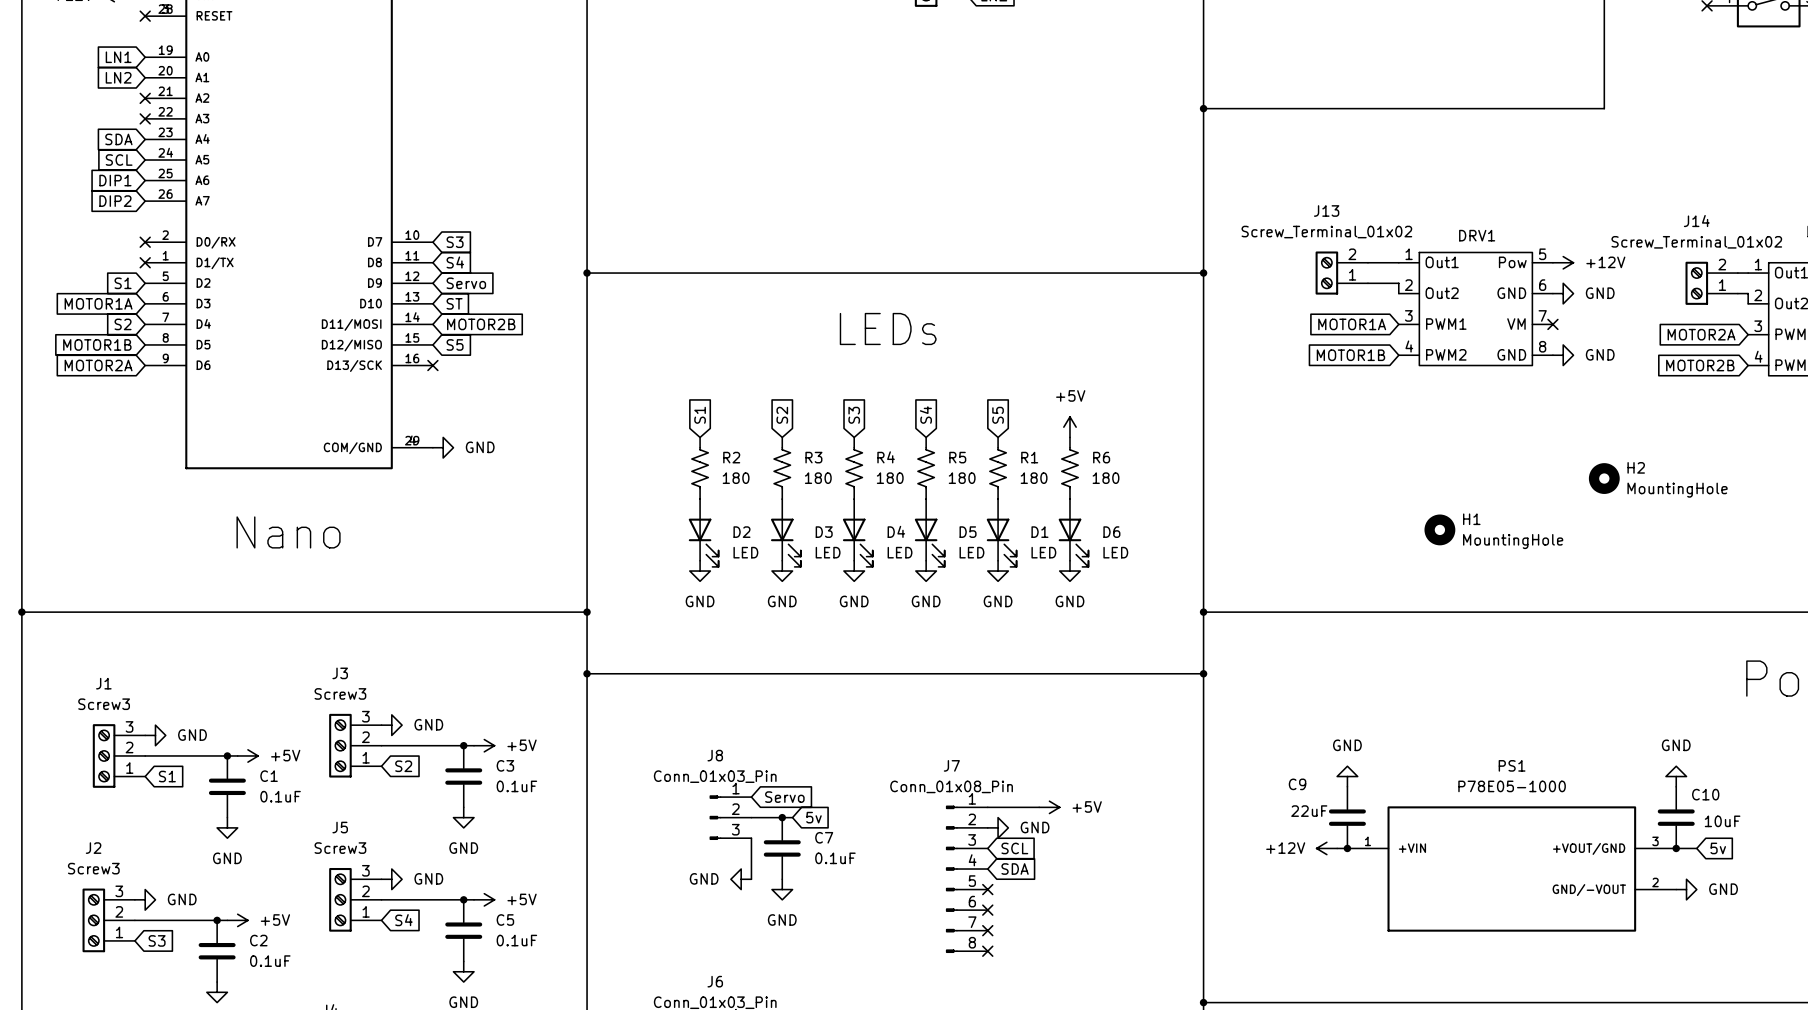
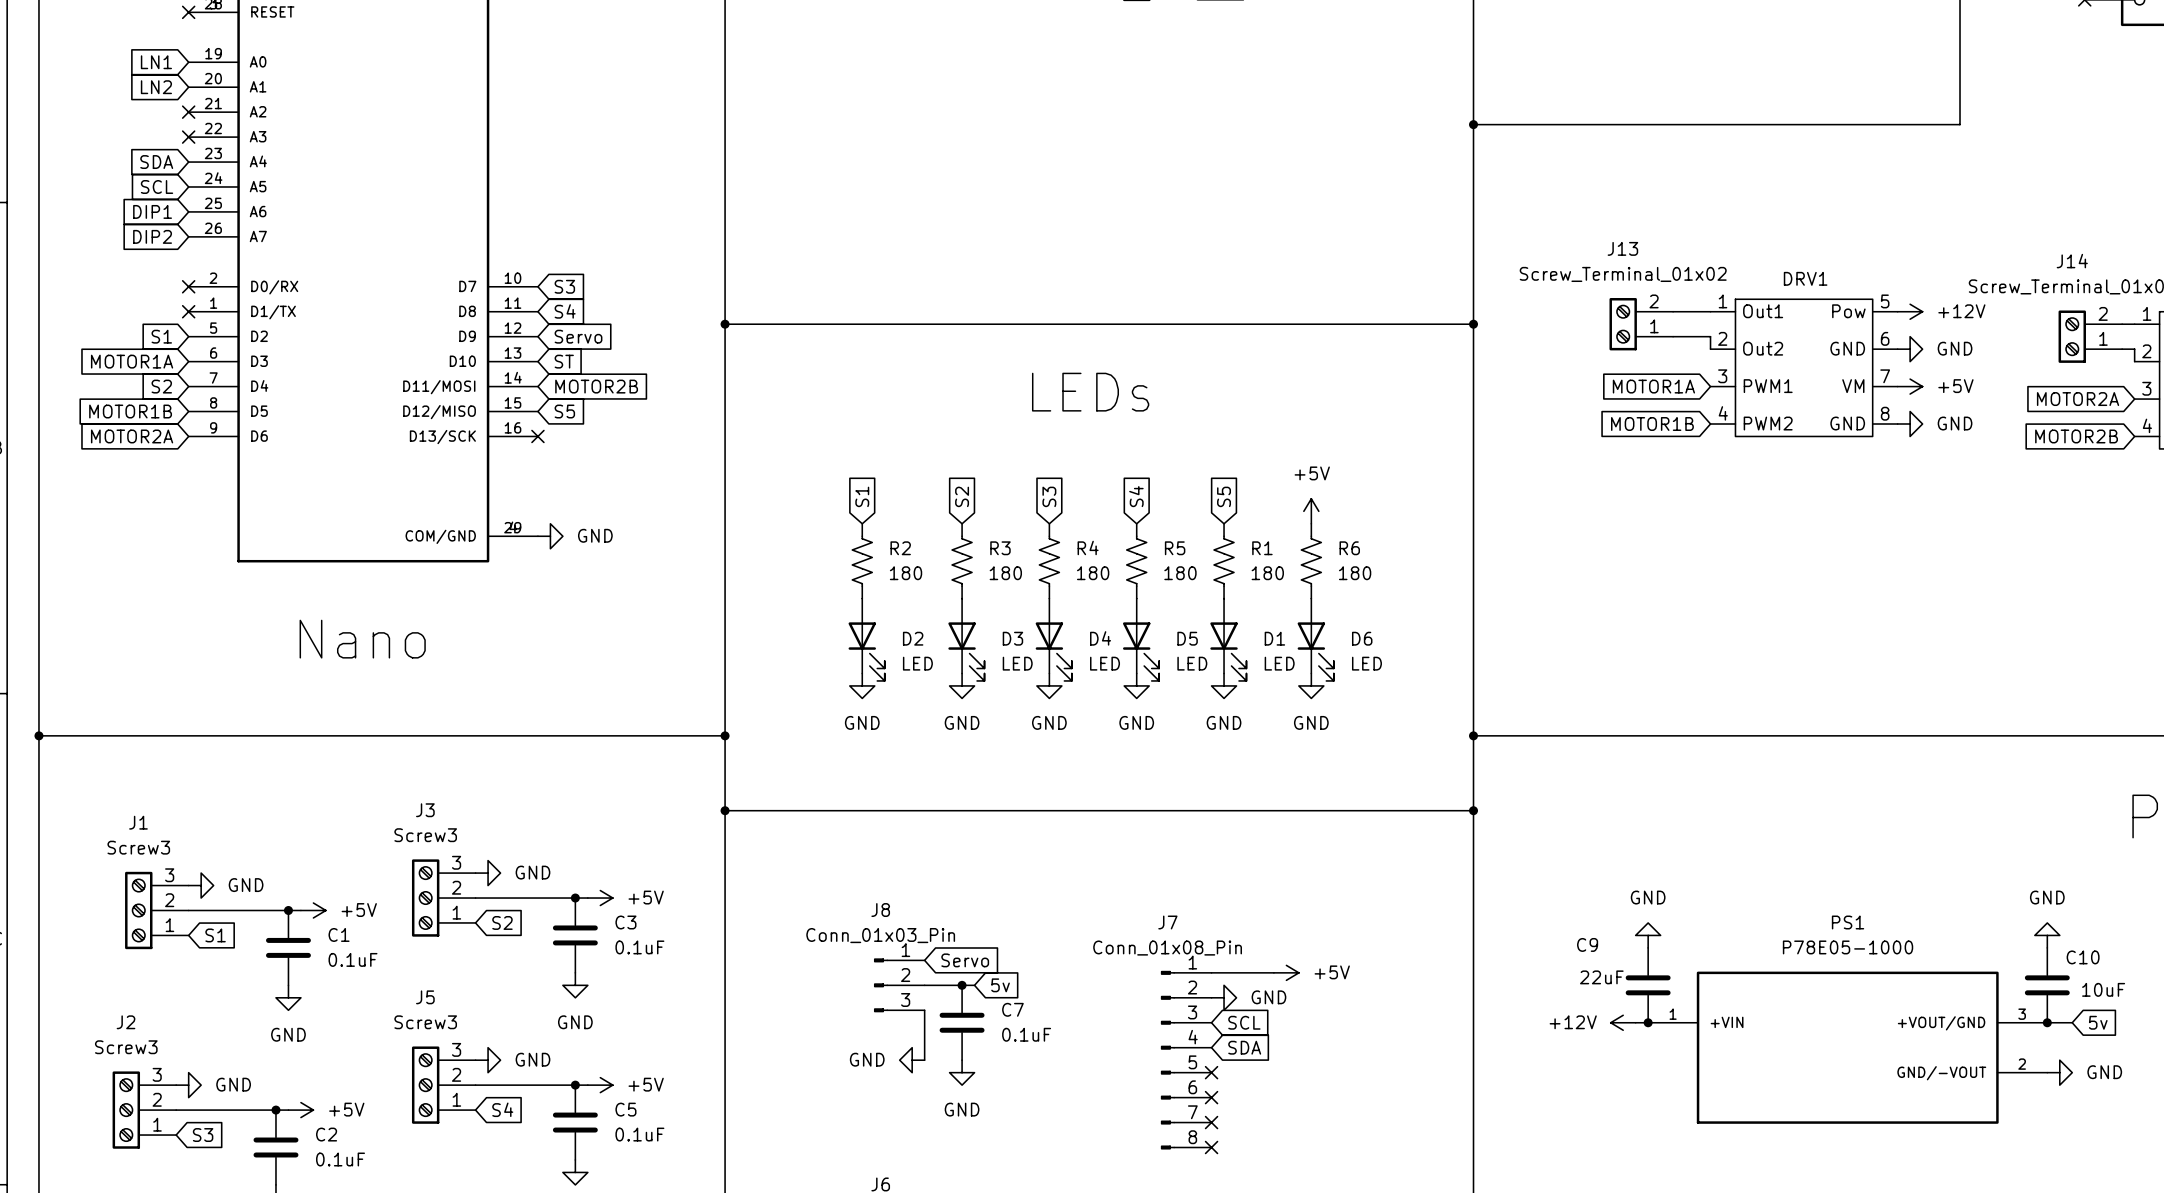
no-connect mark: (1552, 324) -> none
power symbol: none -> +5V (1910, 386)
H2: MountingHole (1604, 478) -> none
H1: MountingHole (1439, 529) -> none

